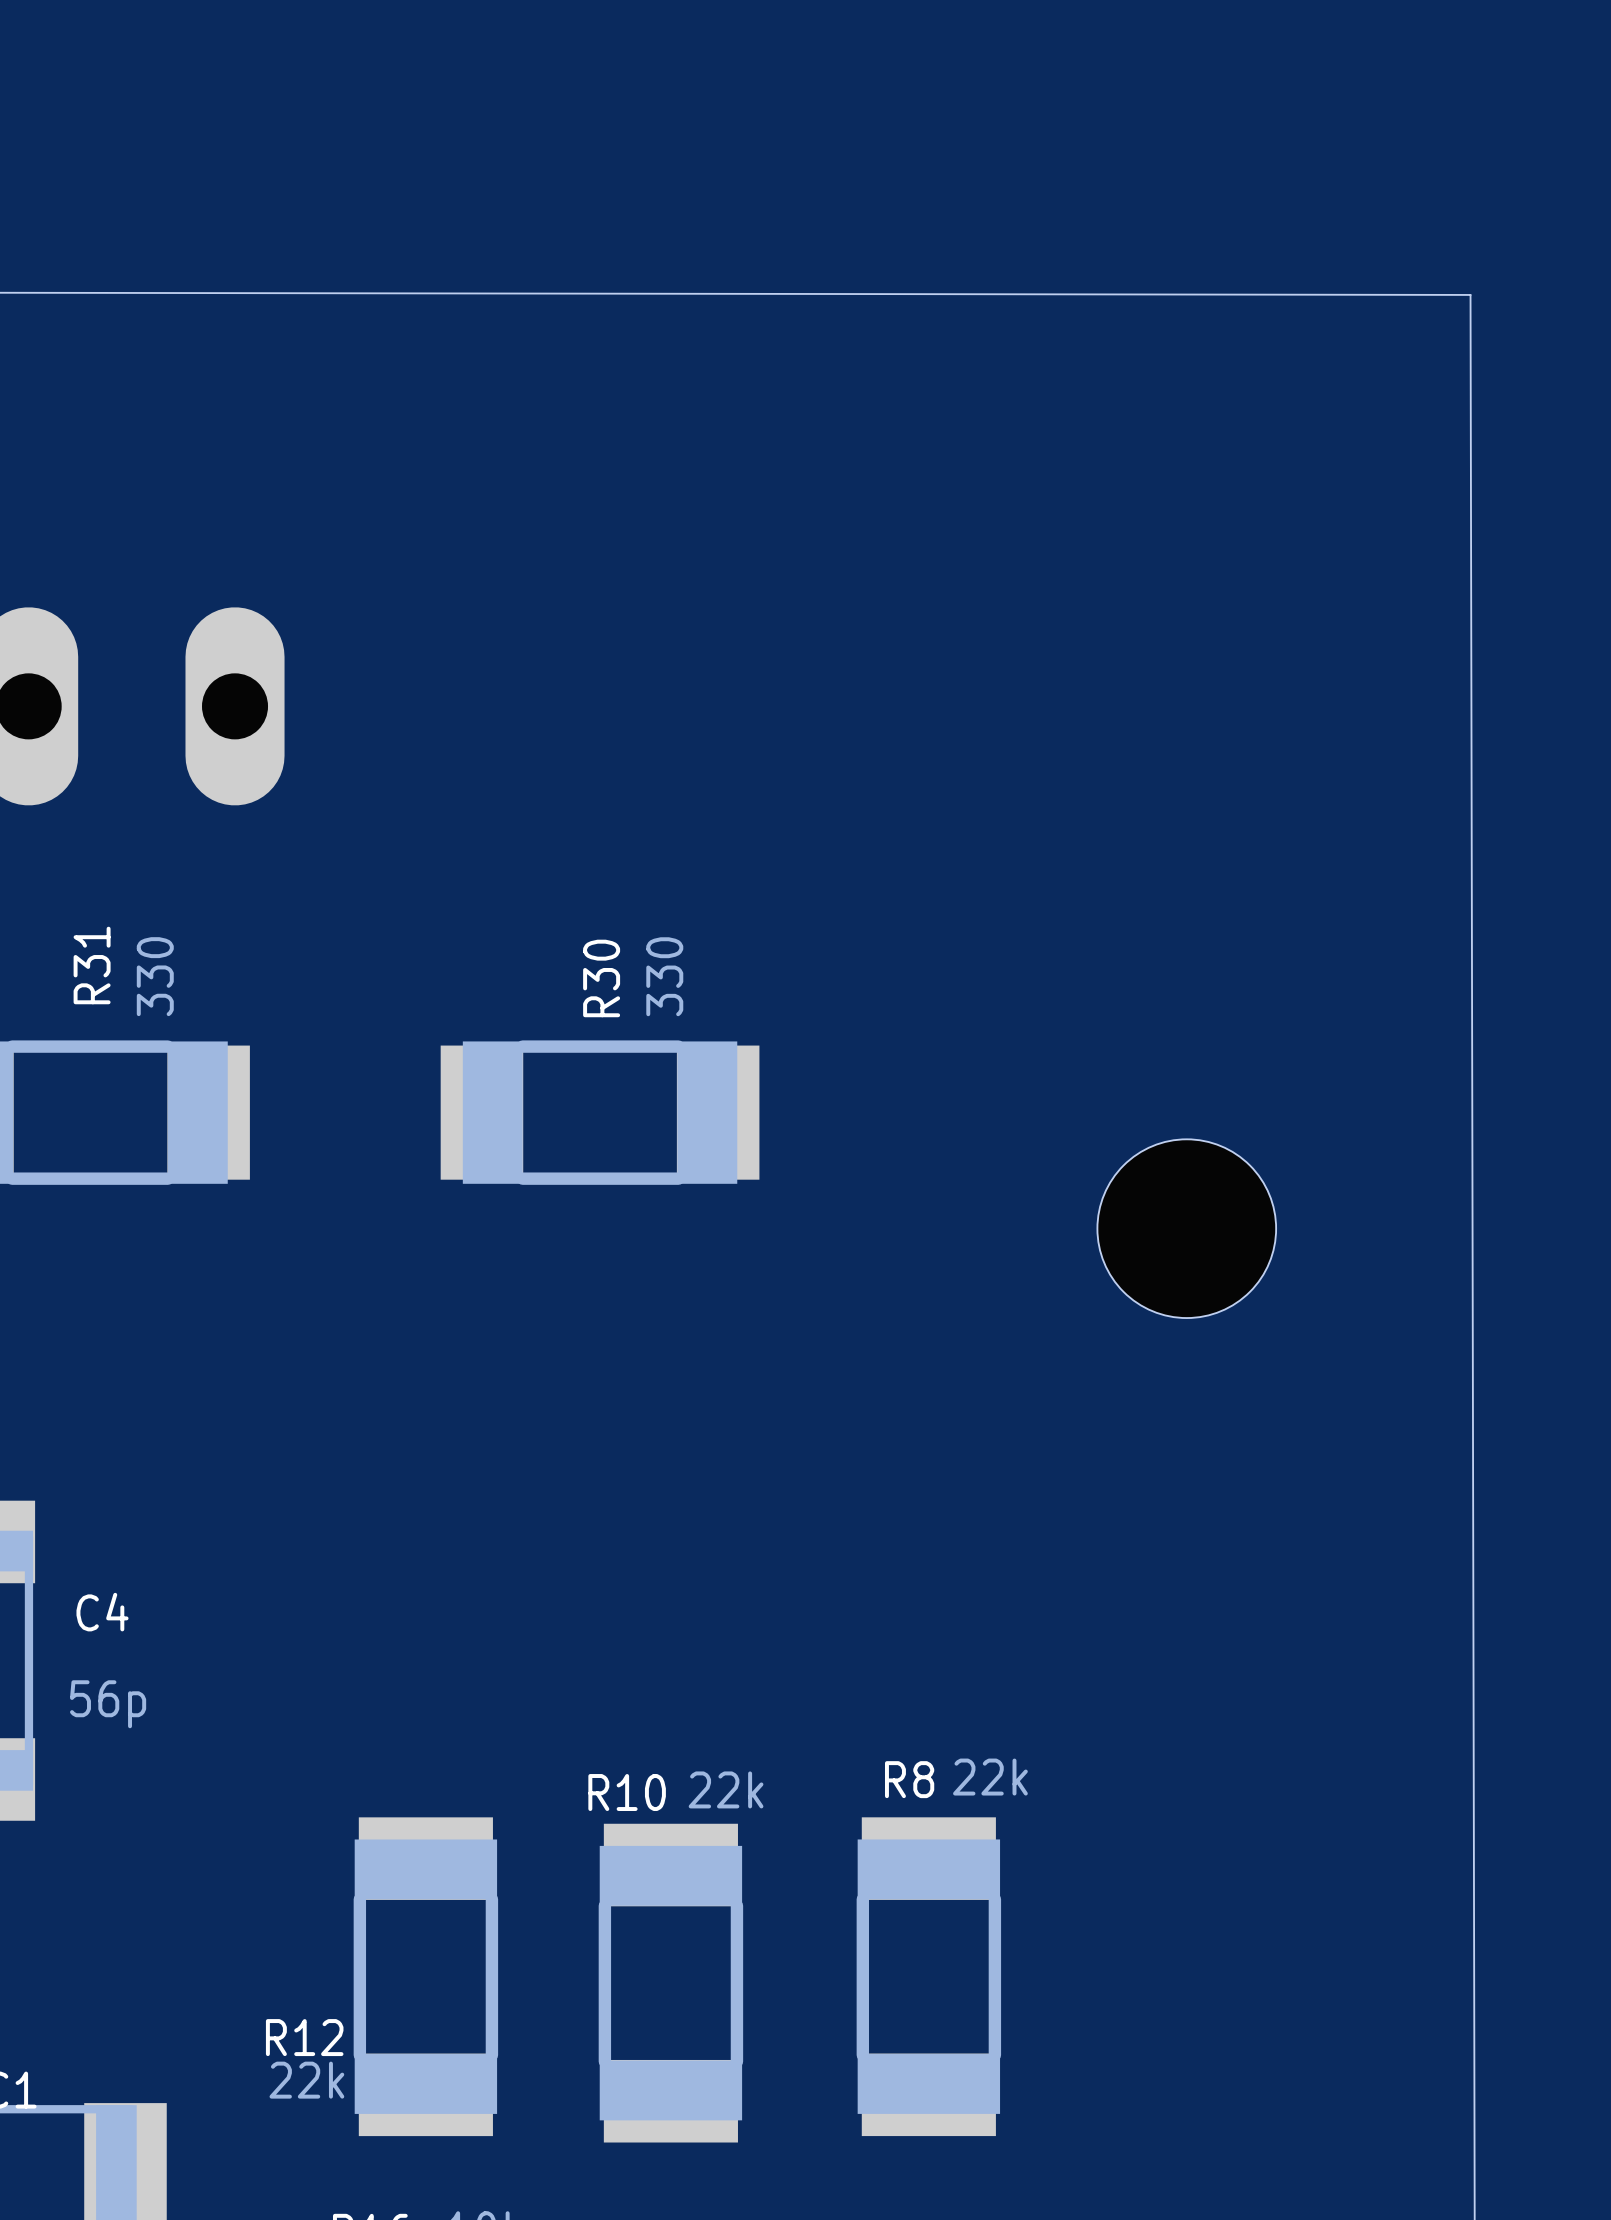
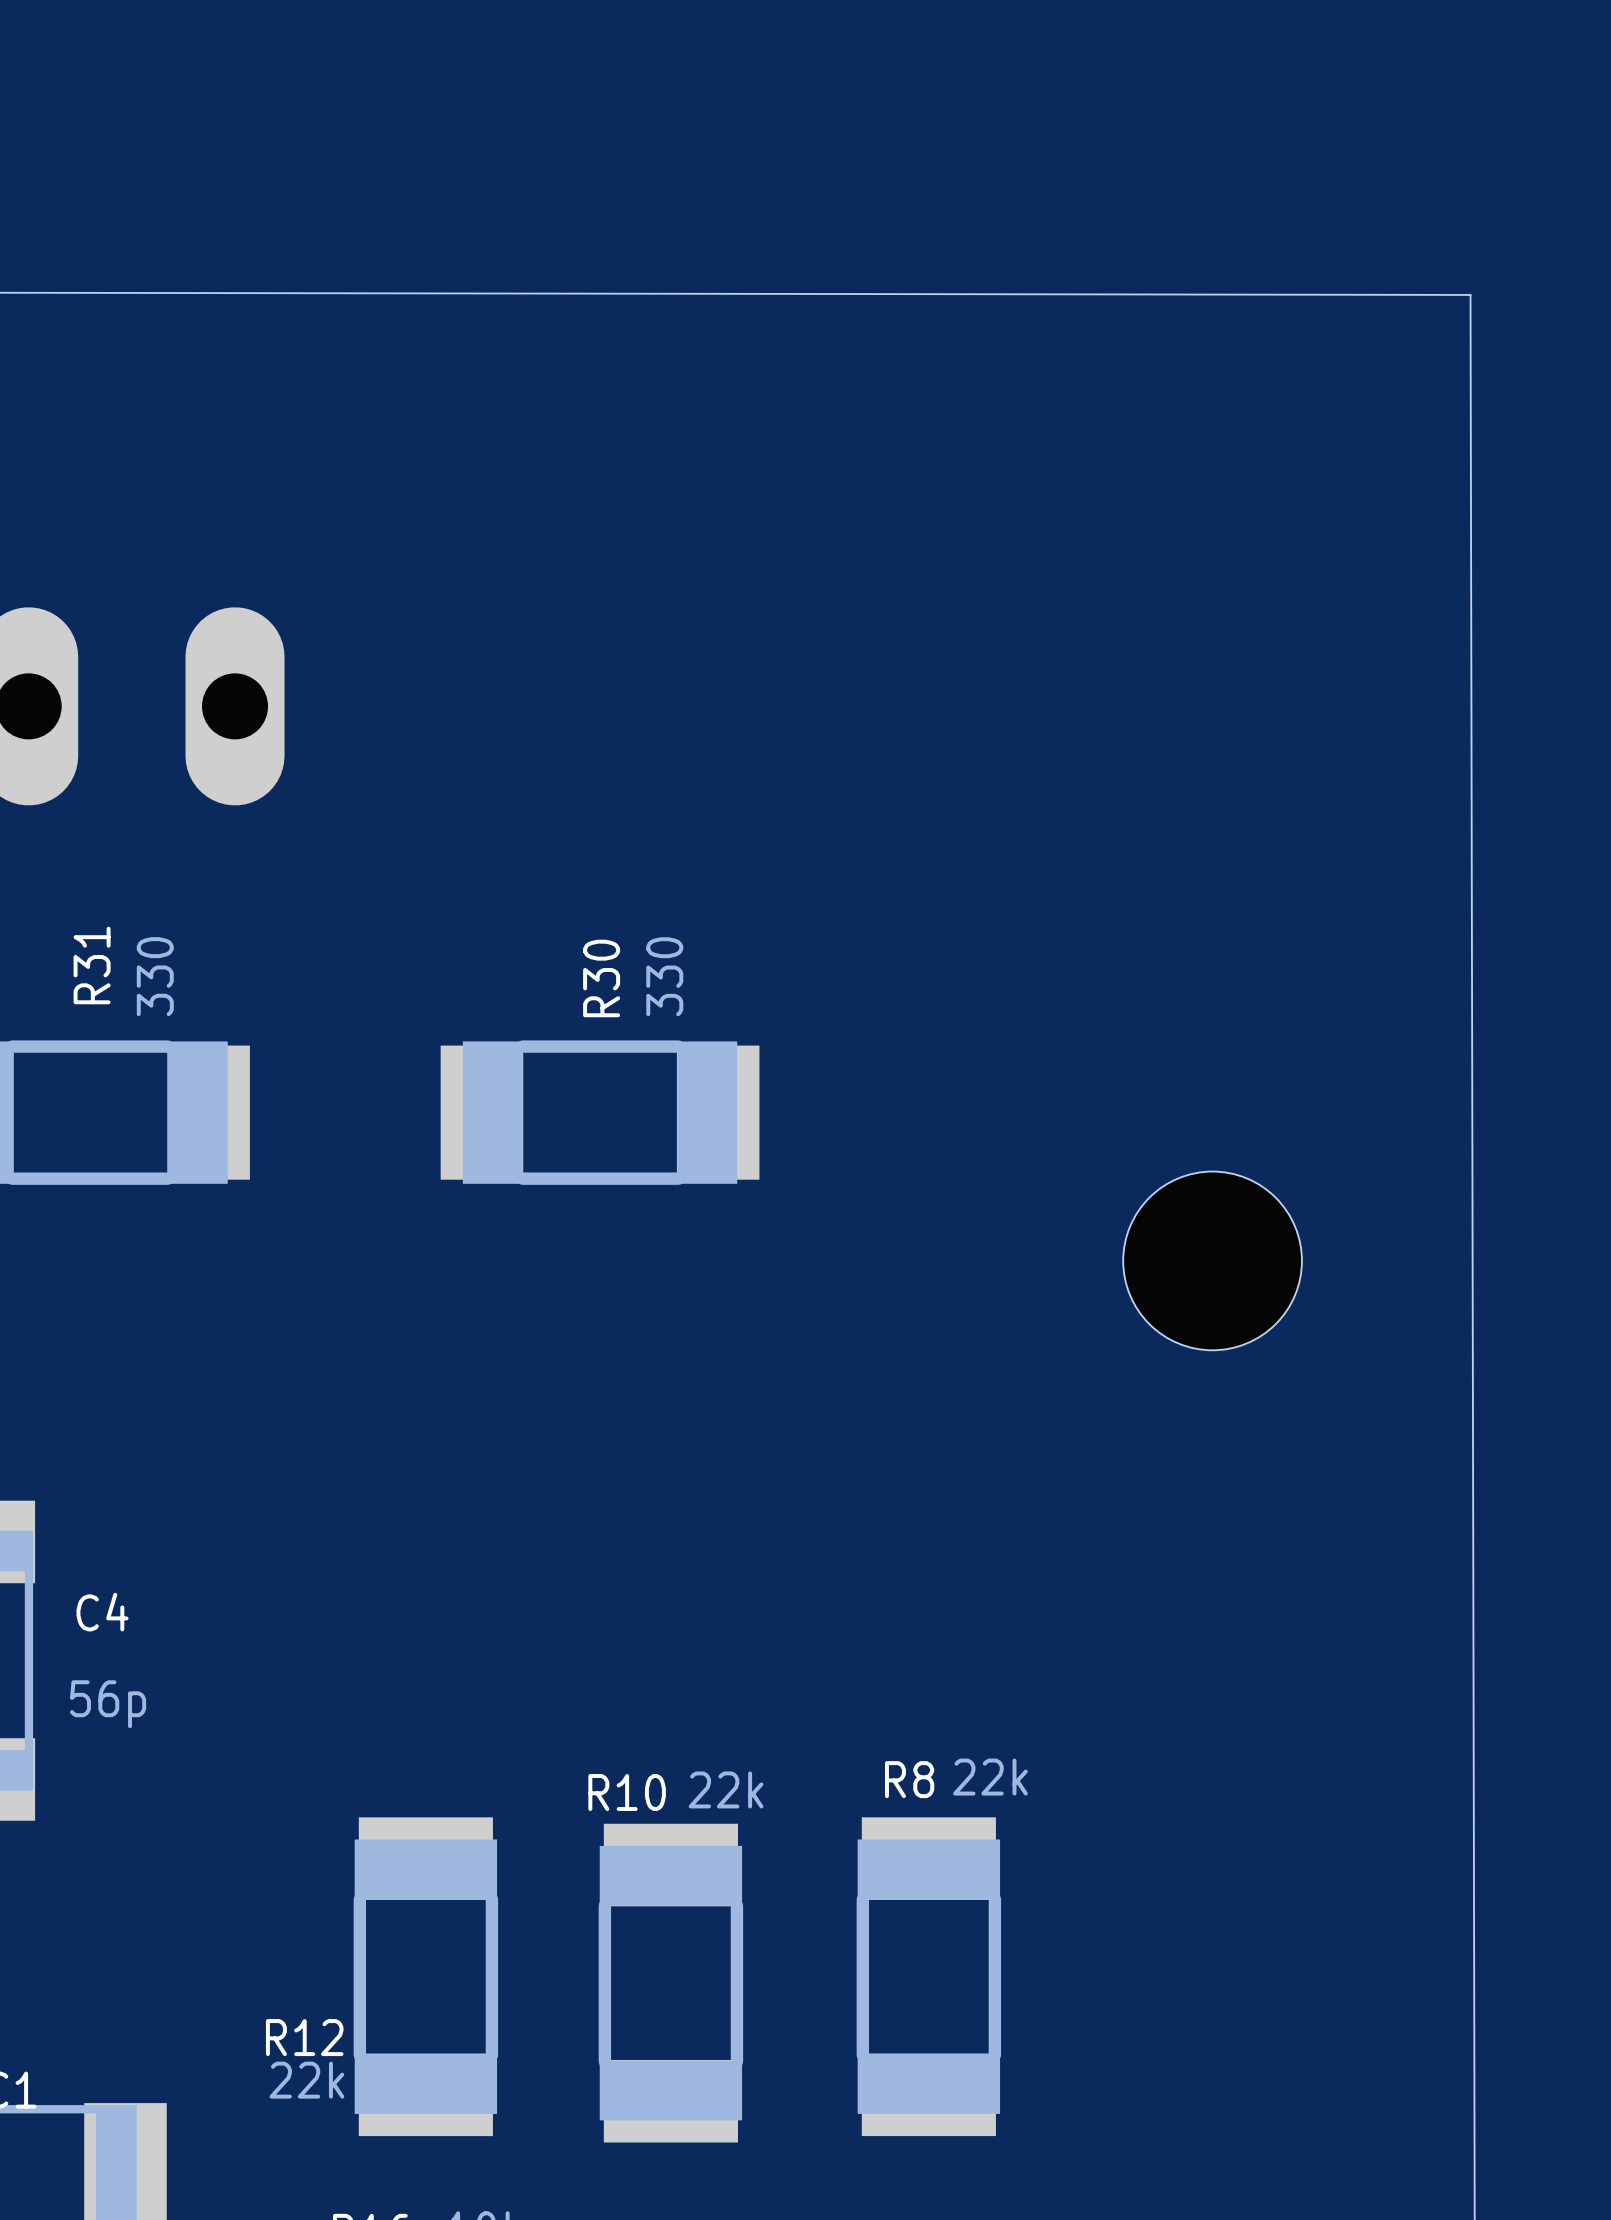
part position: (1186, 1228) -> (1212, 1260)

